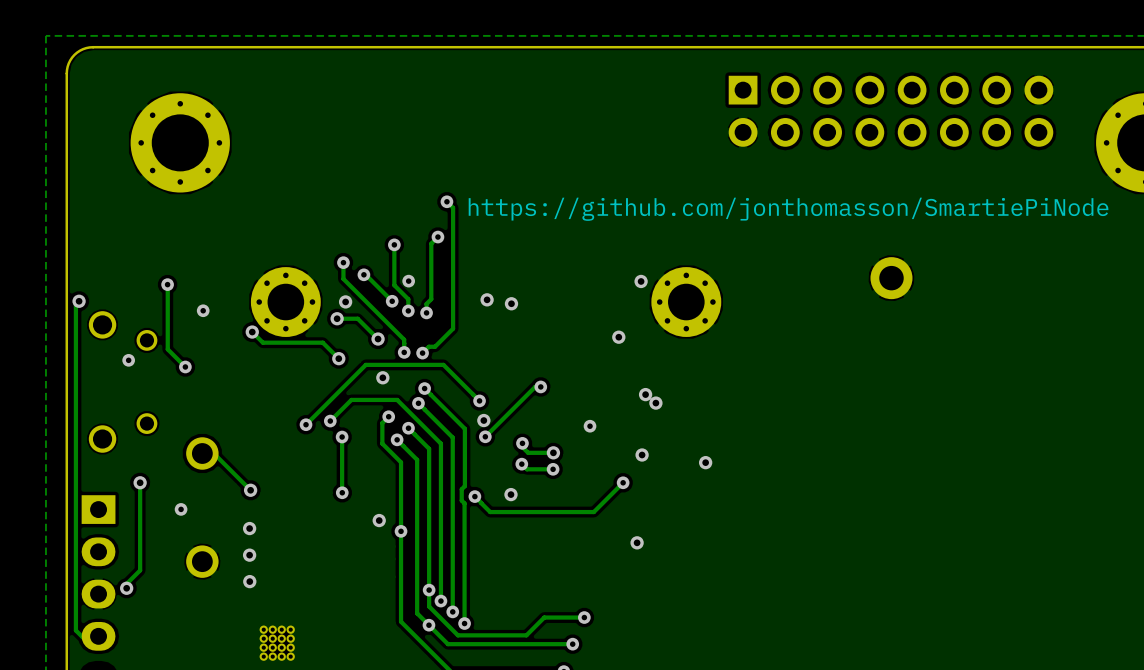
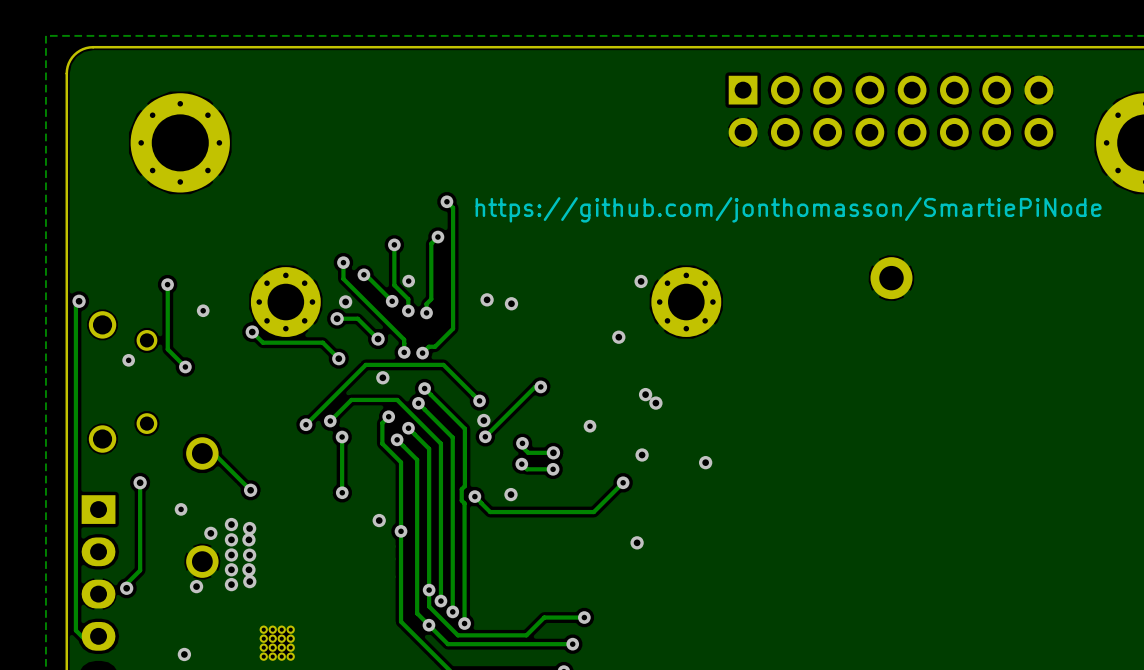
via: none -> (231, 524)
via: none -> (210, 533)
via: none -> (231, 539)
via: none -> (248, 539)
via: none -> (231, 554)
via: none -> (231, 569)
via: none -> (248, 569)
via: none -> (231, 584)
via: none -> (196, 586)
via: none -> (184, 654)

